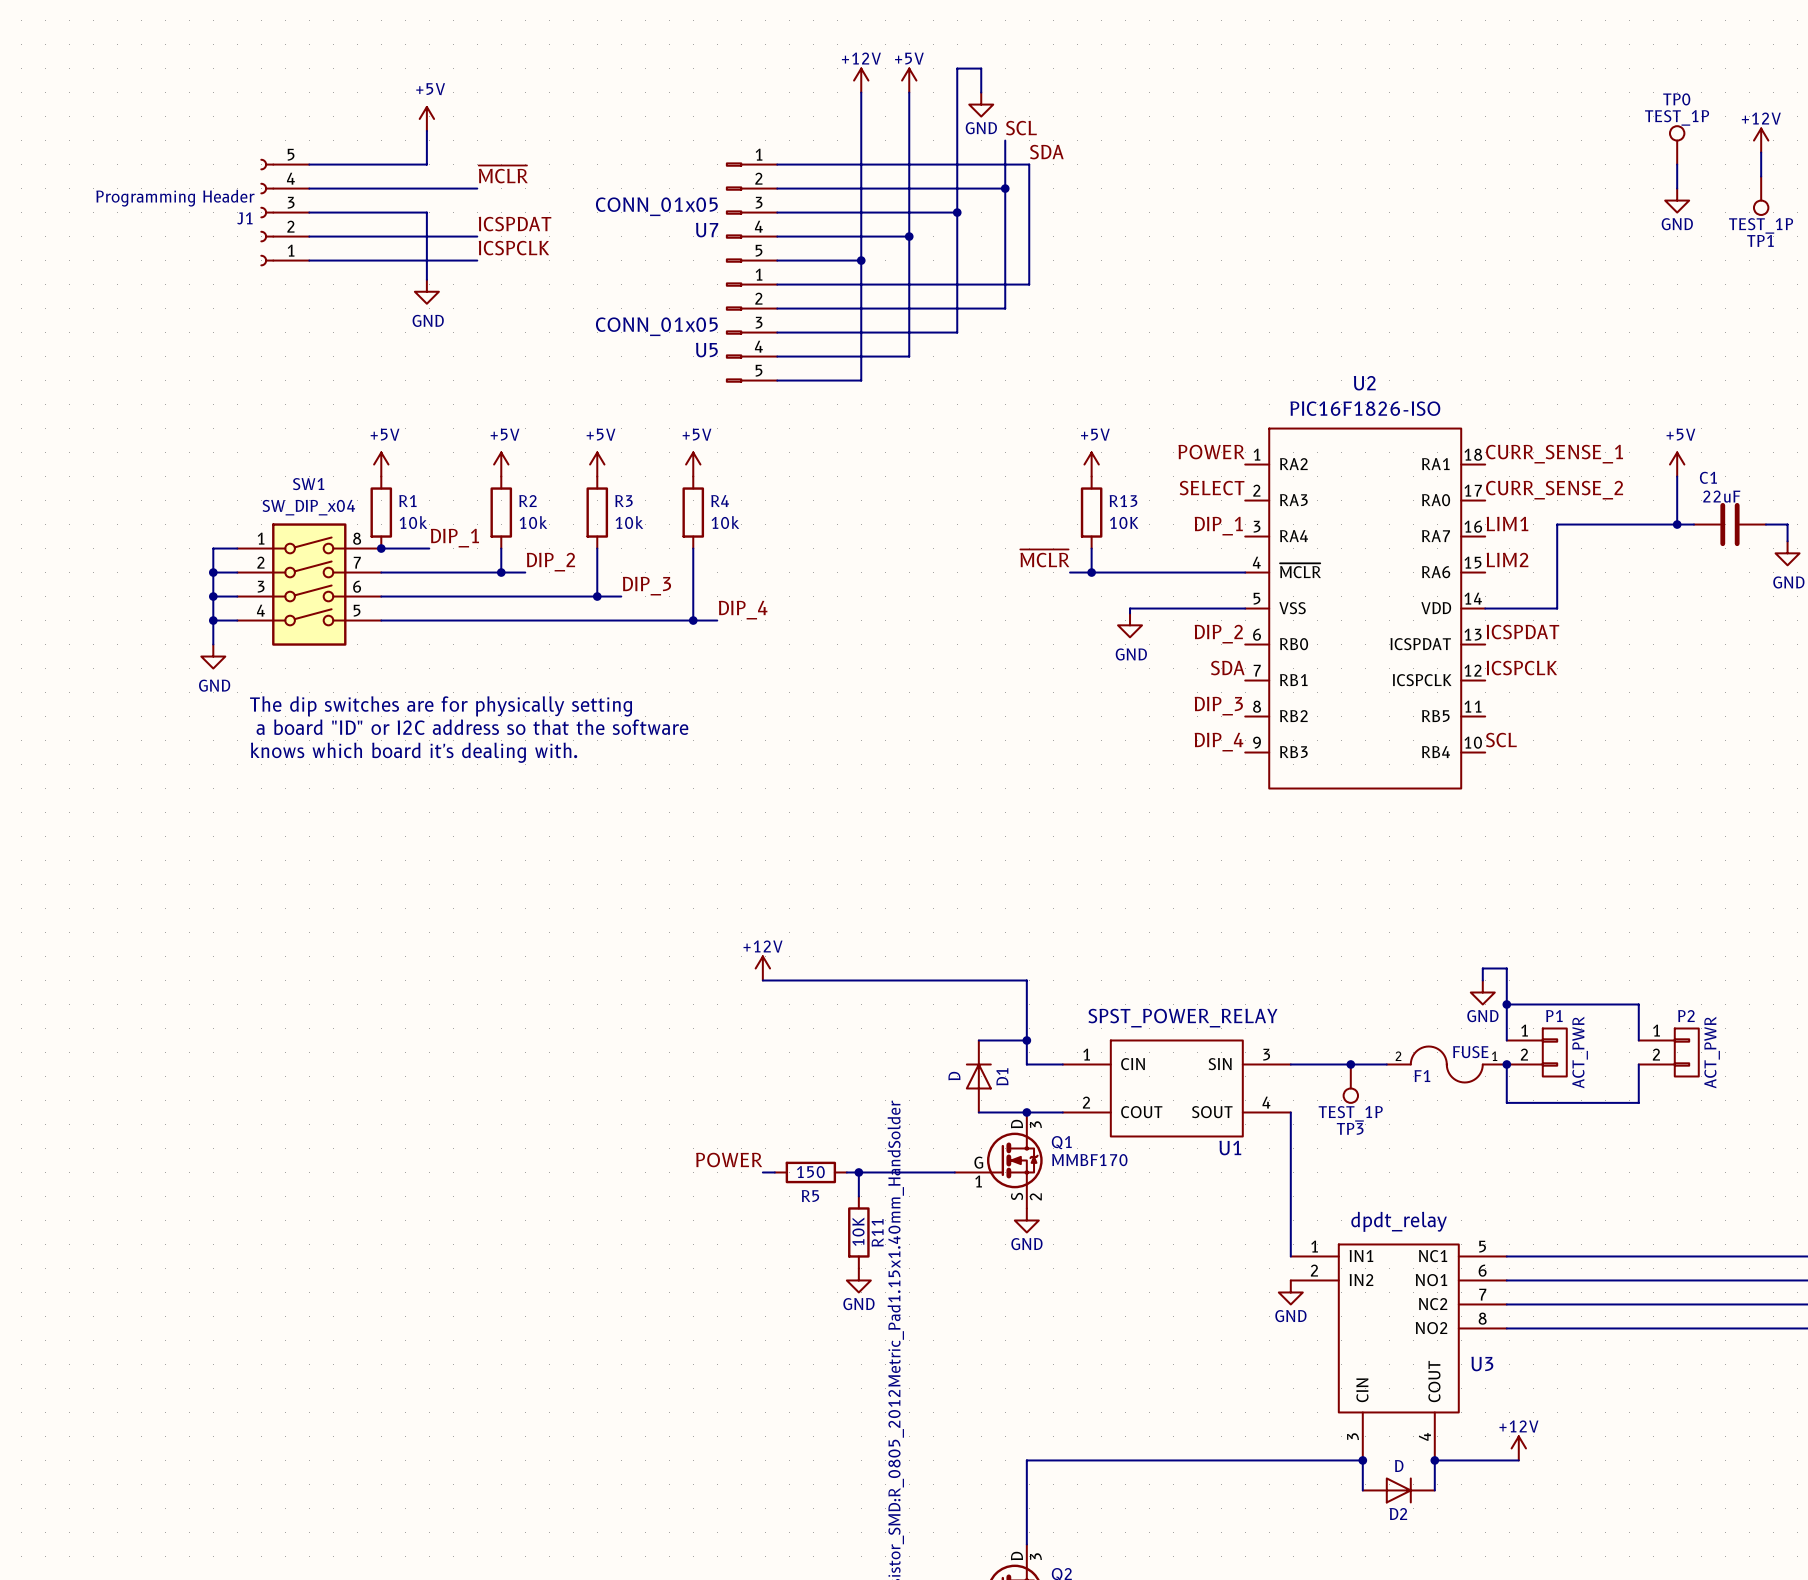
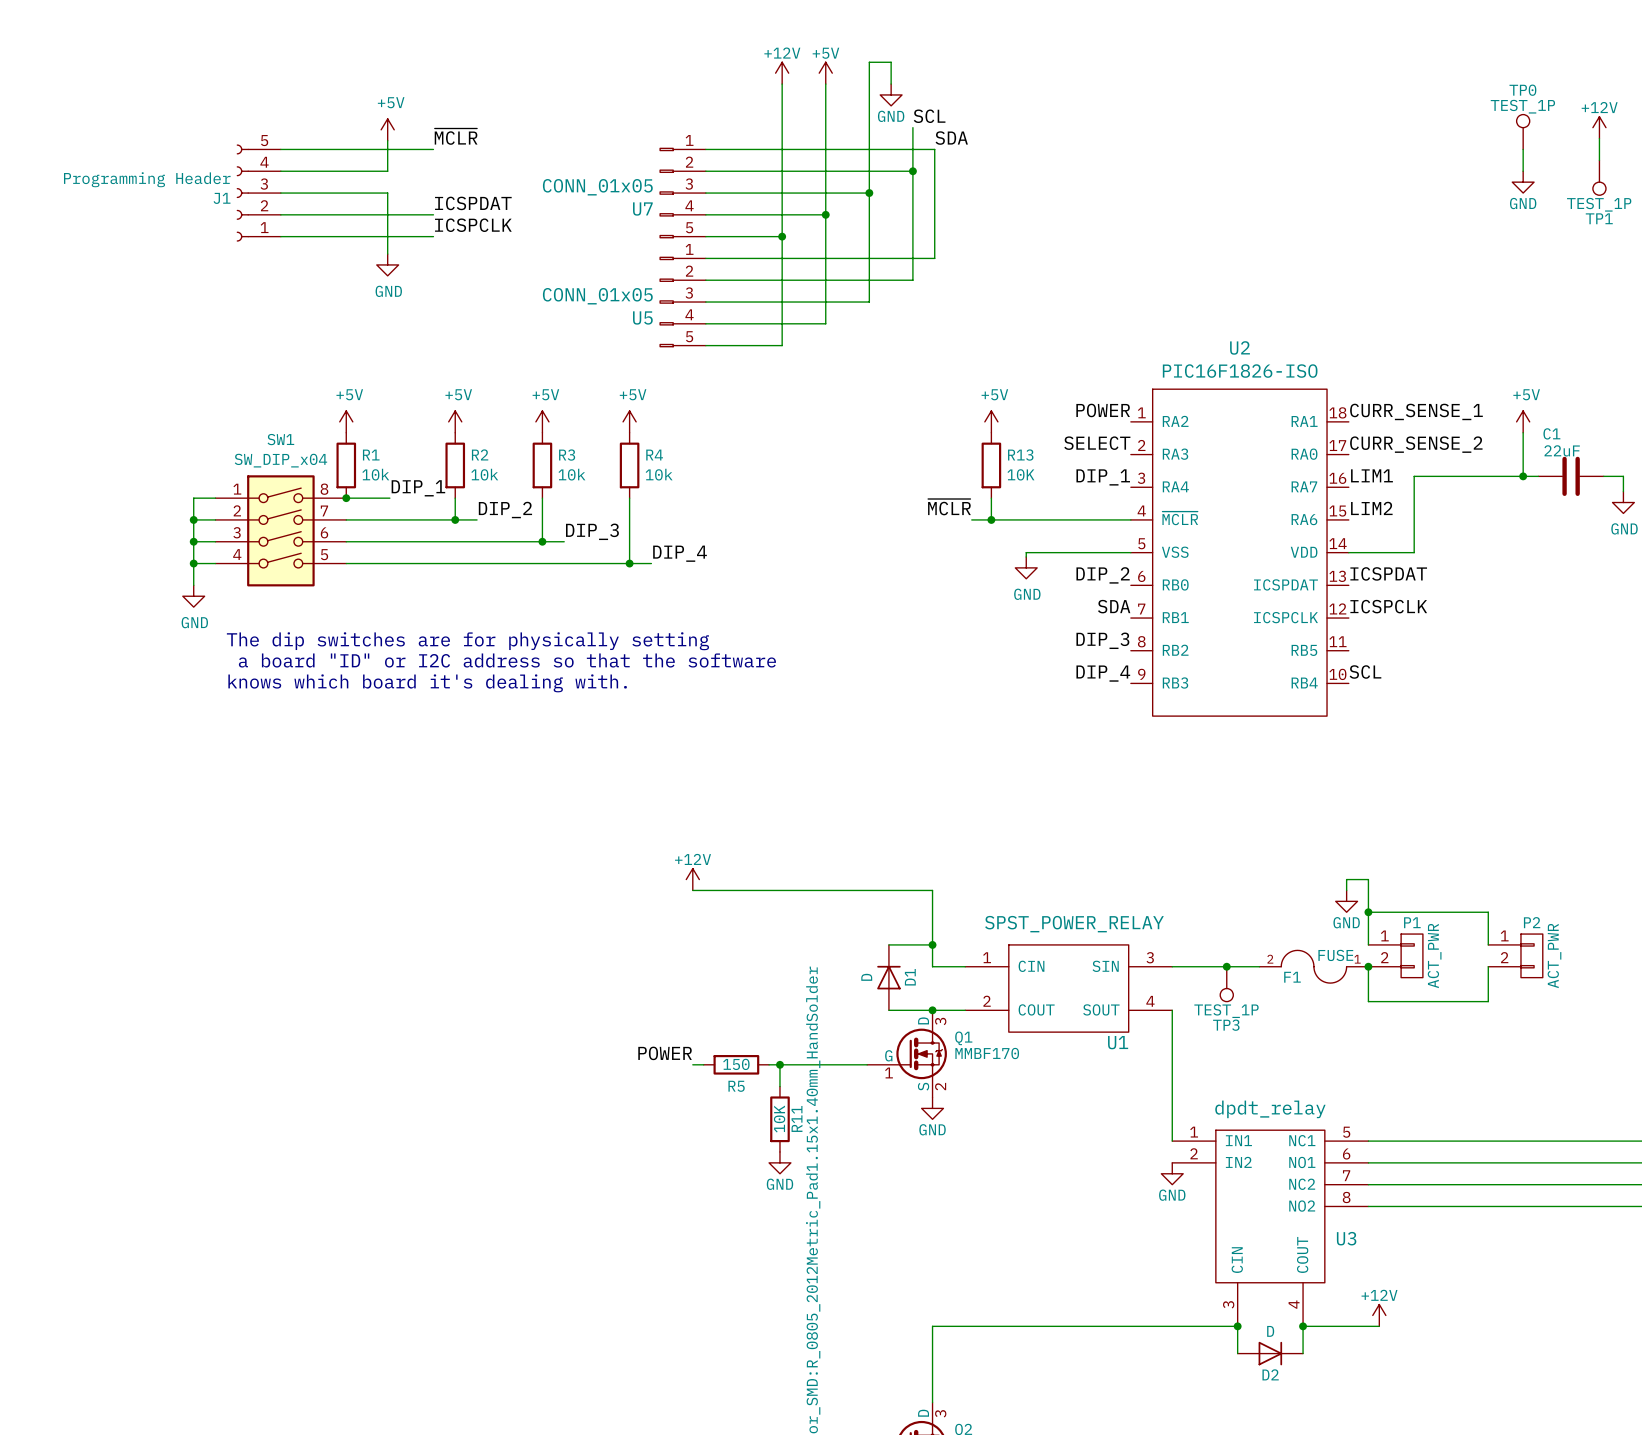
power symbol position: +5V (426, 118) -> +5V (387, 129)
label position: ~{MCLR} (503, 174) -> ~{MCLR} (456, 136)
wire: (426, 188) (477, 188) -> (387, 171) (387, 149) (433, 149)

